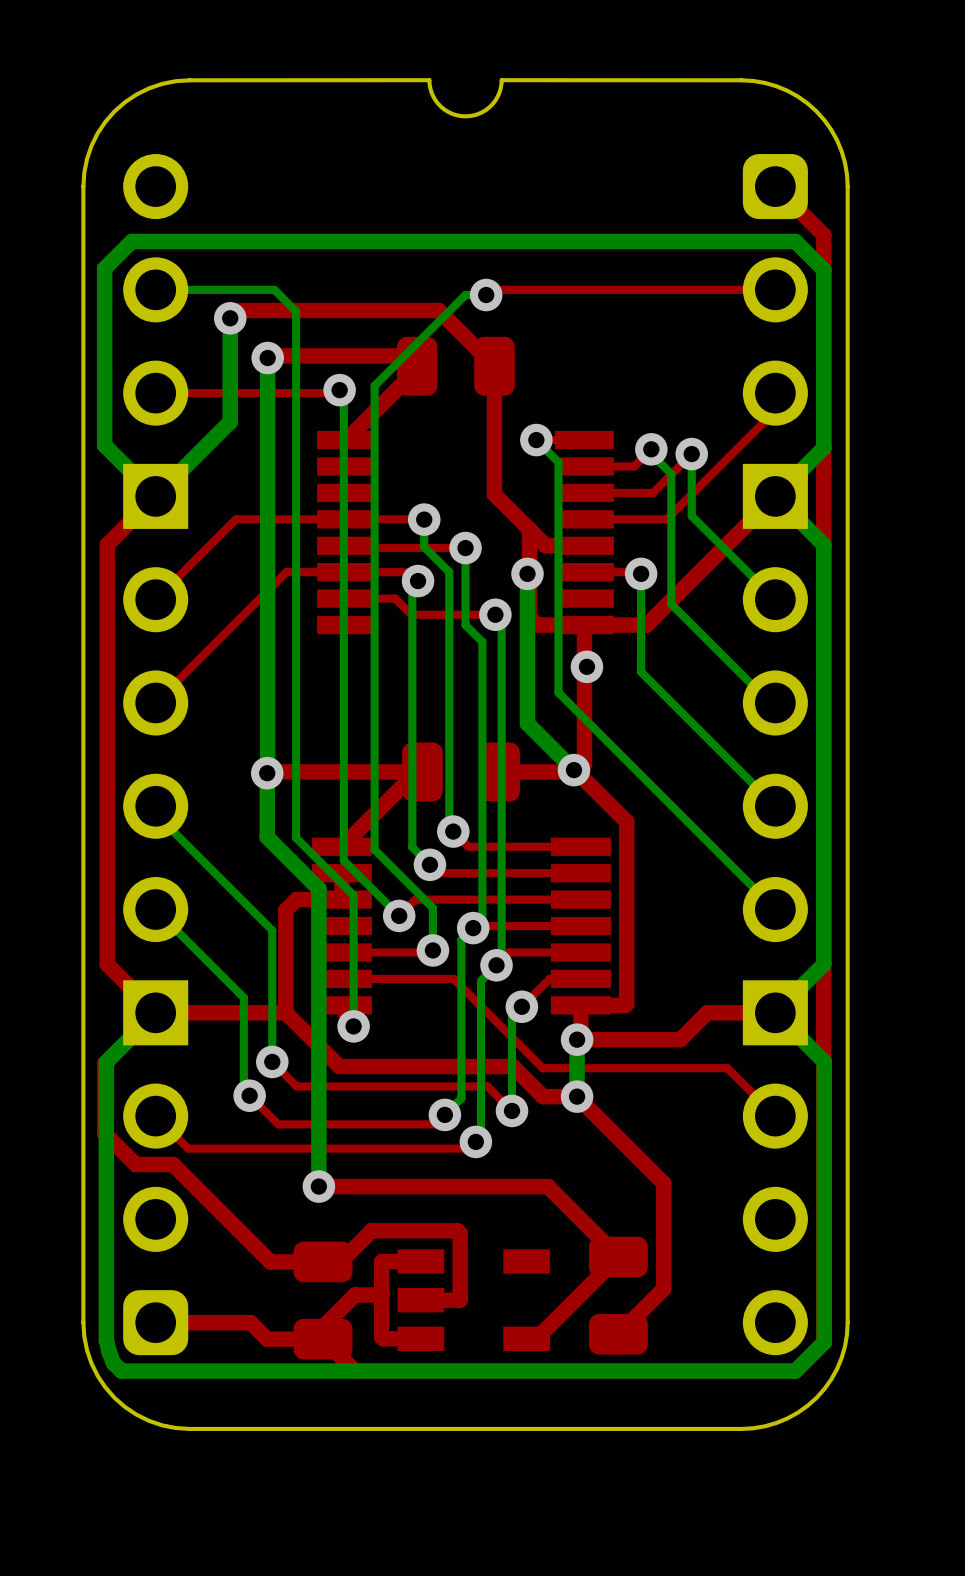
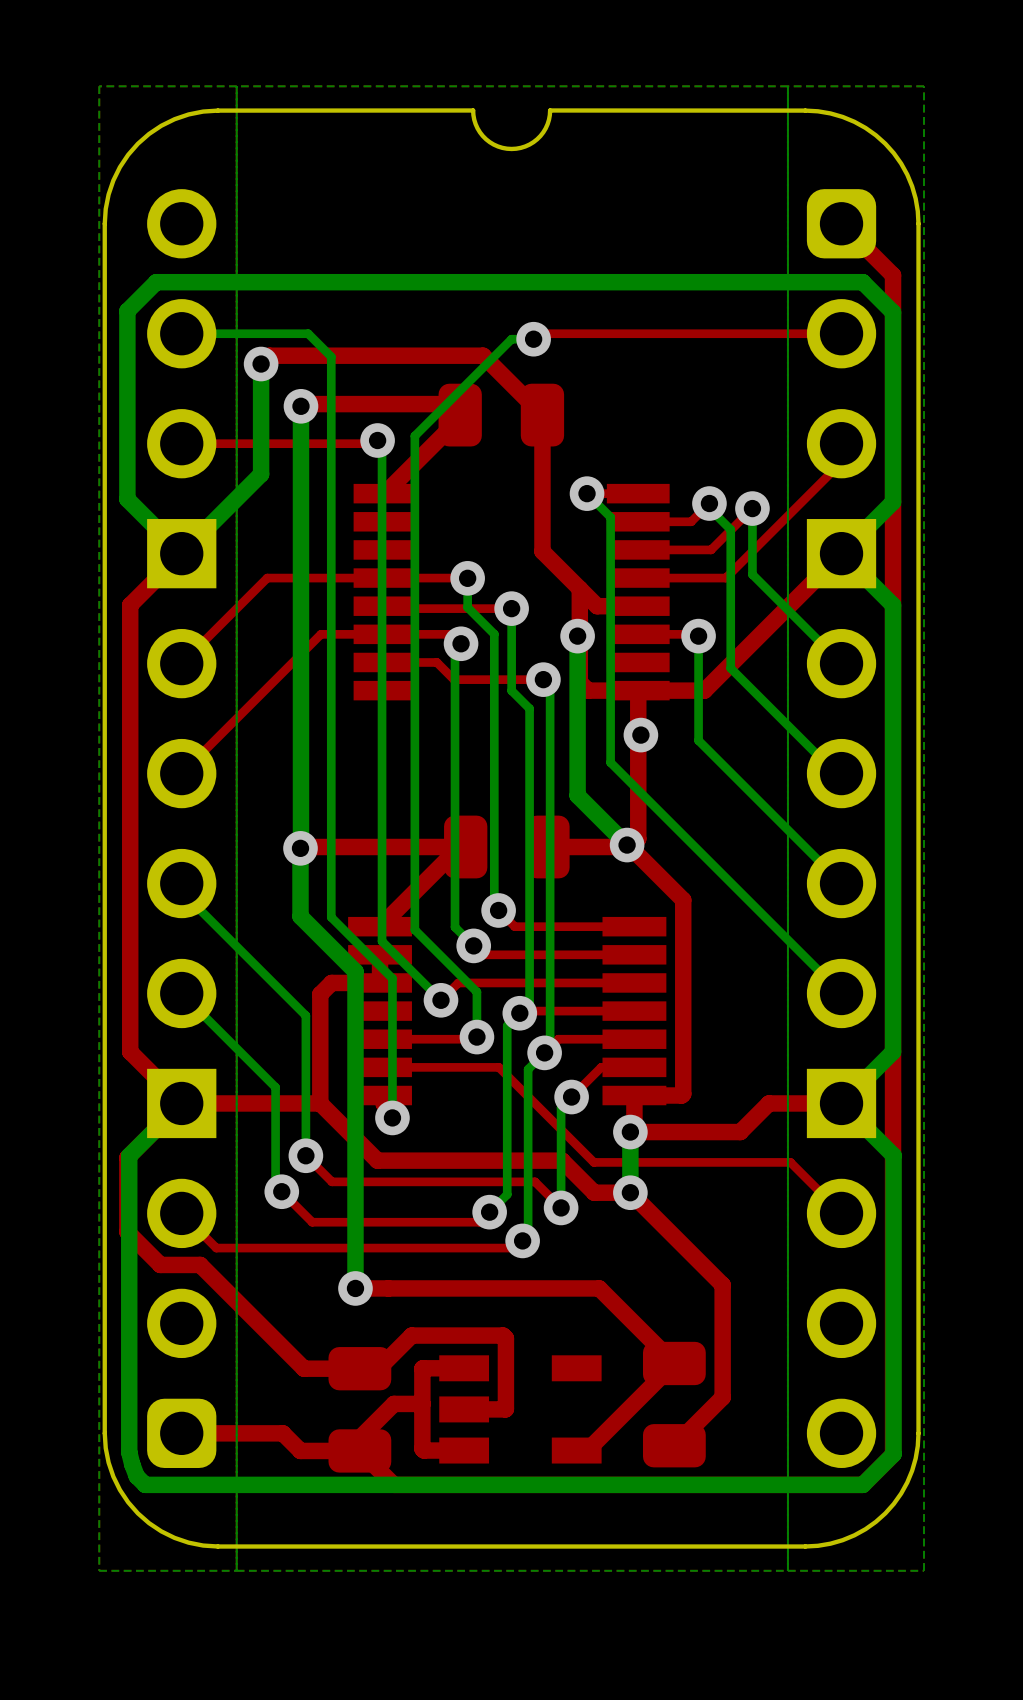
bottom zone outline: none -> (236, 86) (236, 1570)
bottom zone outline: none -> (787, 86) (787, 1570)
bottom zone outline: none -> (923, 86) (99, 86) (99, 1570) (923, 1570) (923, 86)

